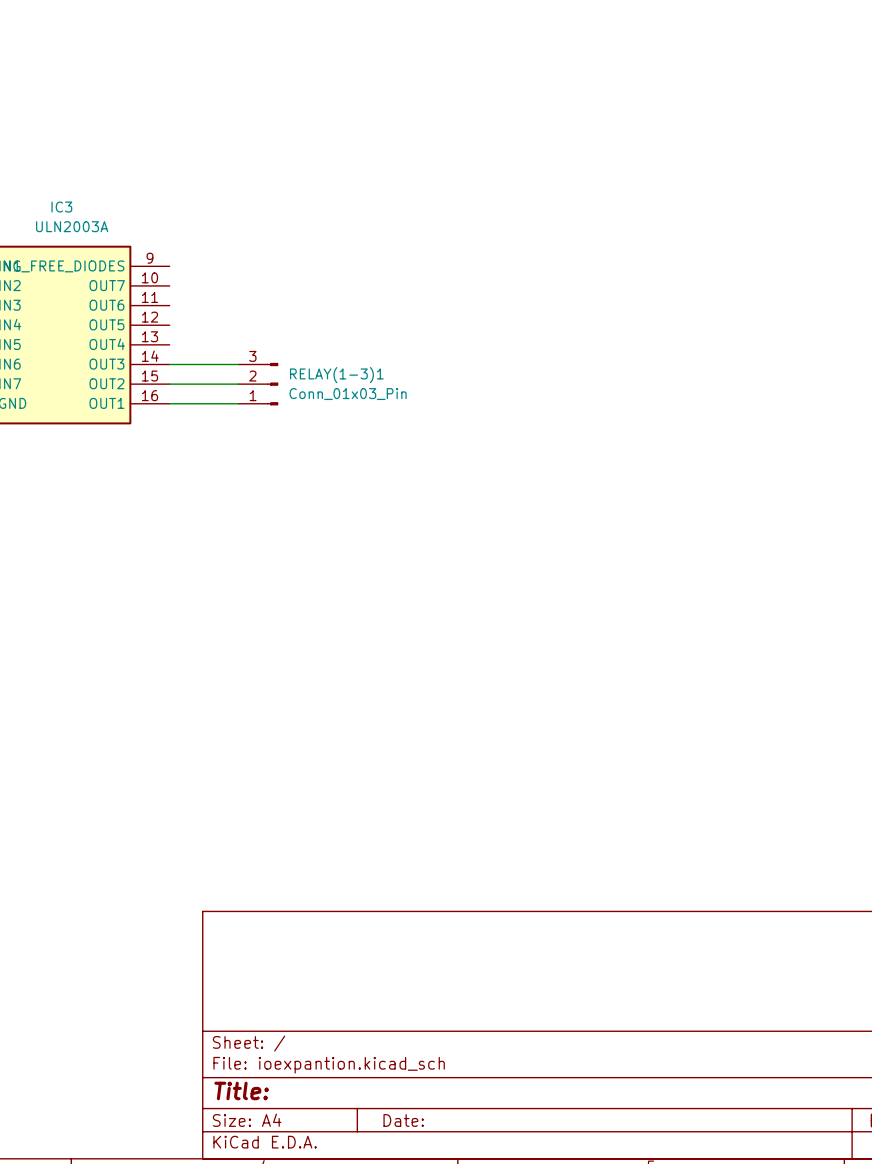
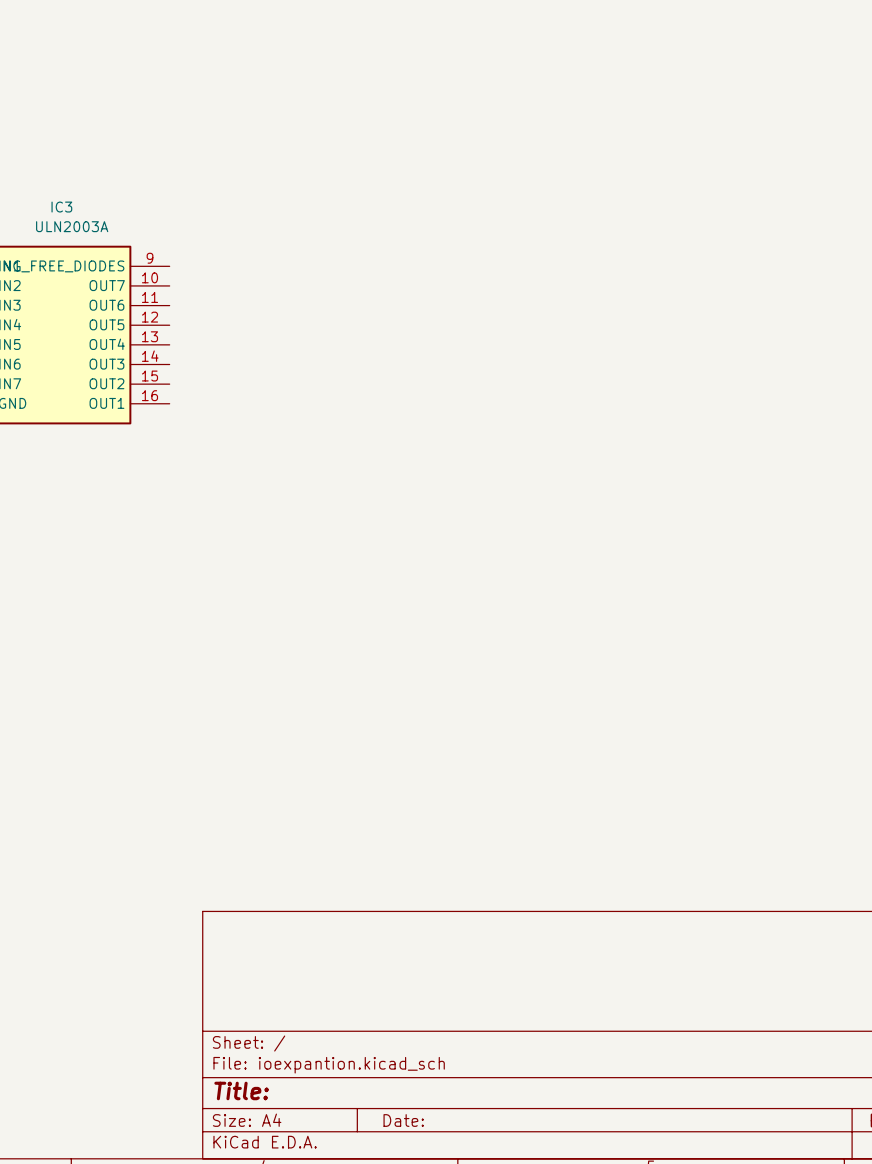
wire: (169, 364) (238, 364) -> none
wire: (169, 384) (238, 384) -> none
RELAY(1-3)1: Conn_01x03_Pin (258, 384) -> none
wire: (169, 403) (238, 403) -> none

